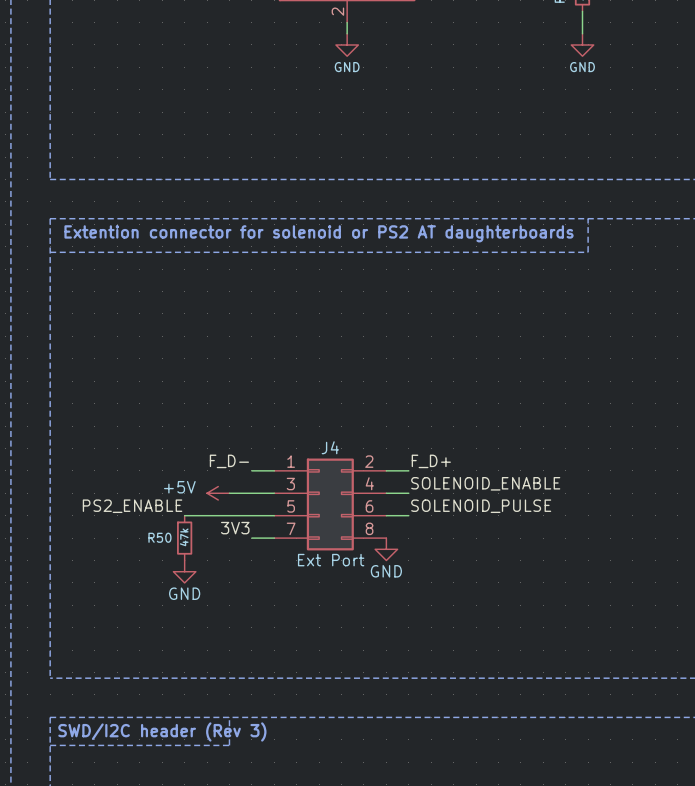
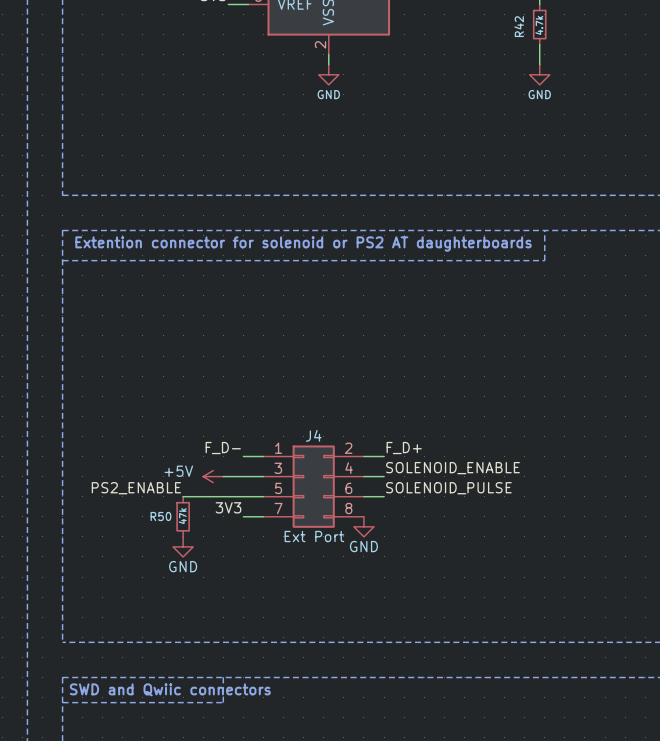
text: SWD/I2C header (Rev 3) (162, 731) -> SWD and Qwiic connectors (170, 689)

